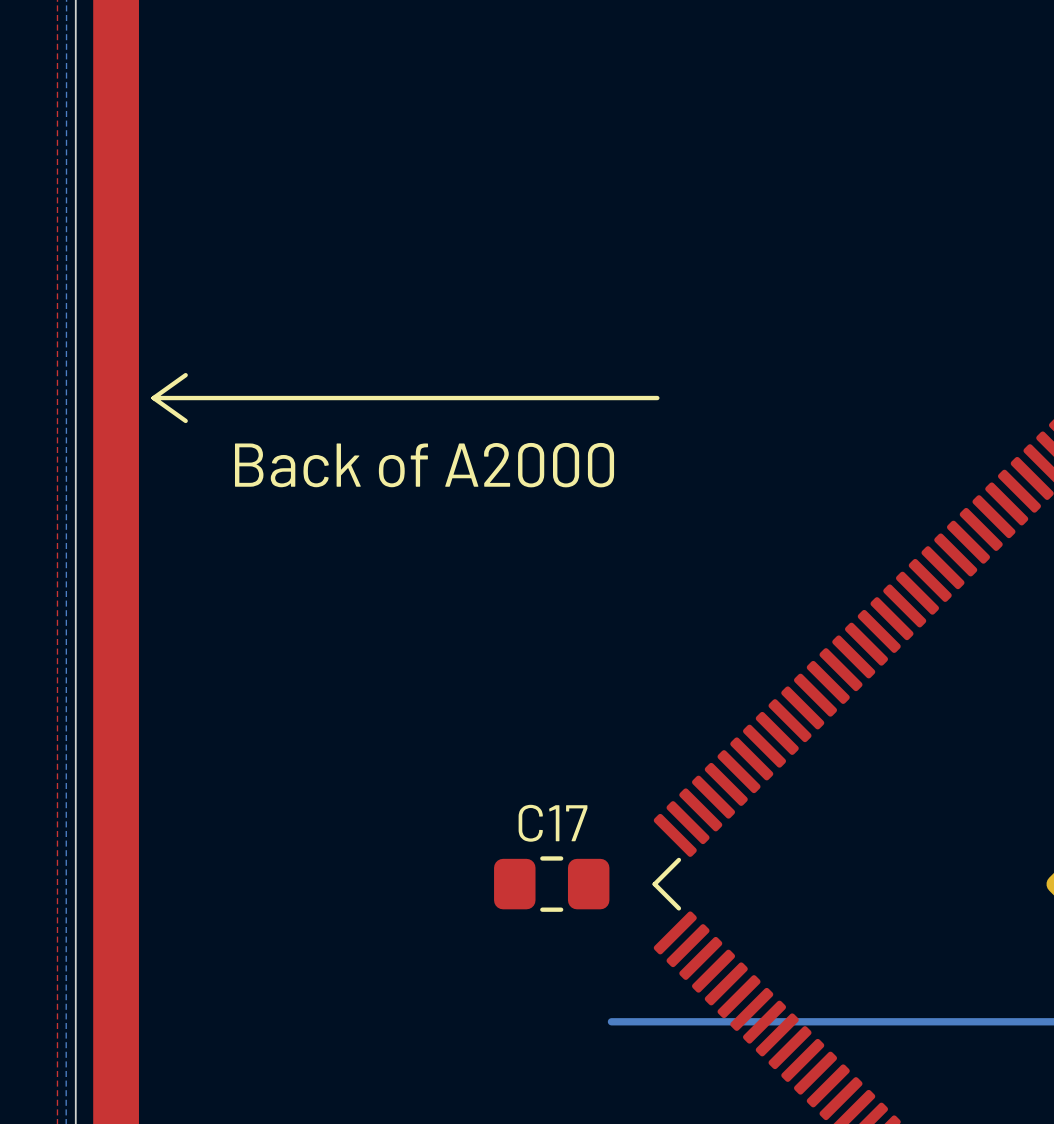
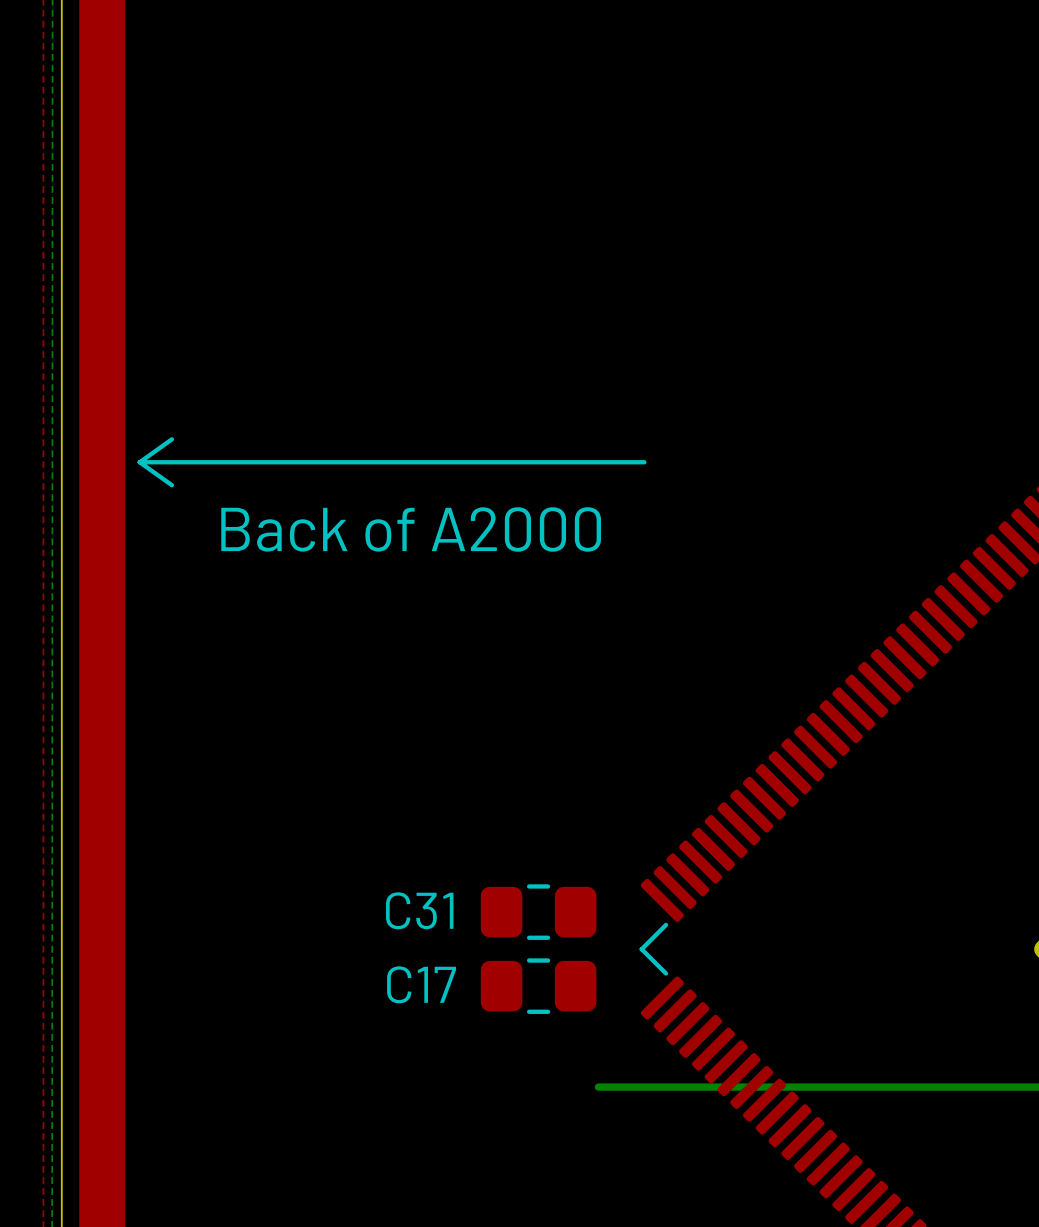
C17 name position: C17 (553, 823) -> C17 (421, 984)
C31: none -> (538, 912)
C17 position: (551, 884) -> (538, 986)

